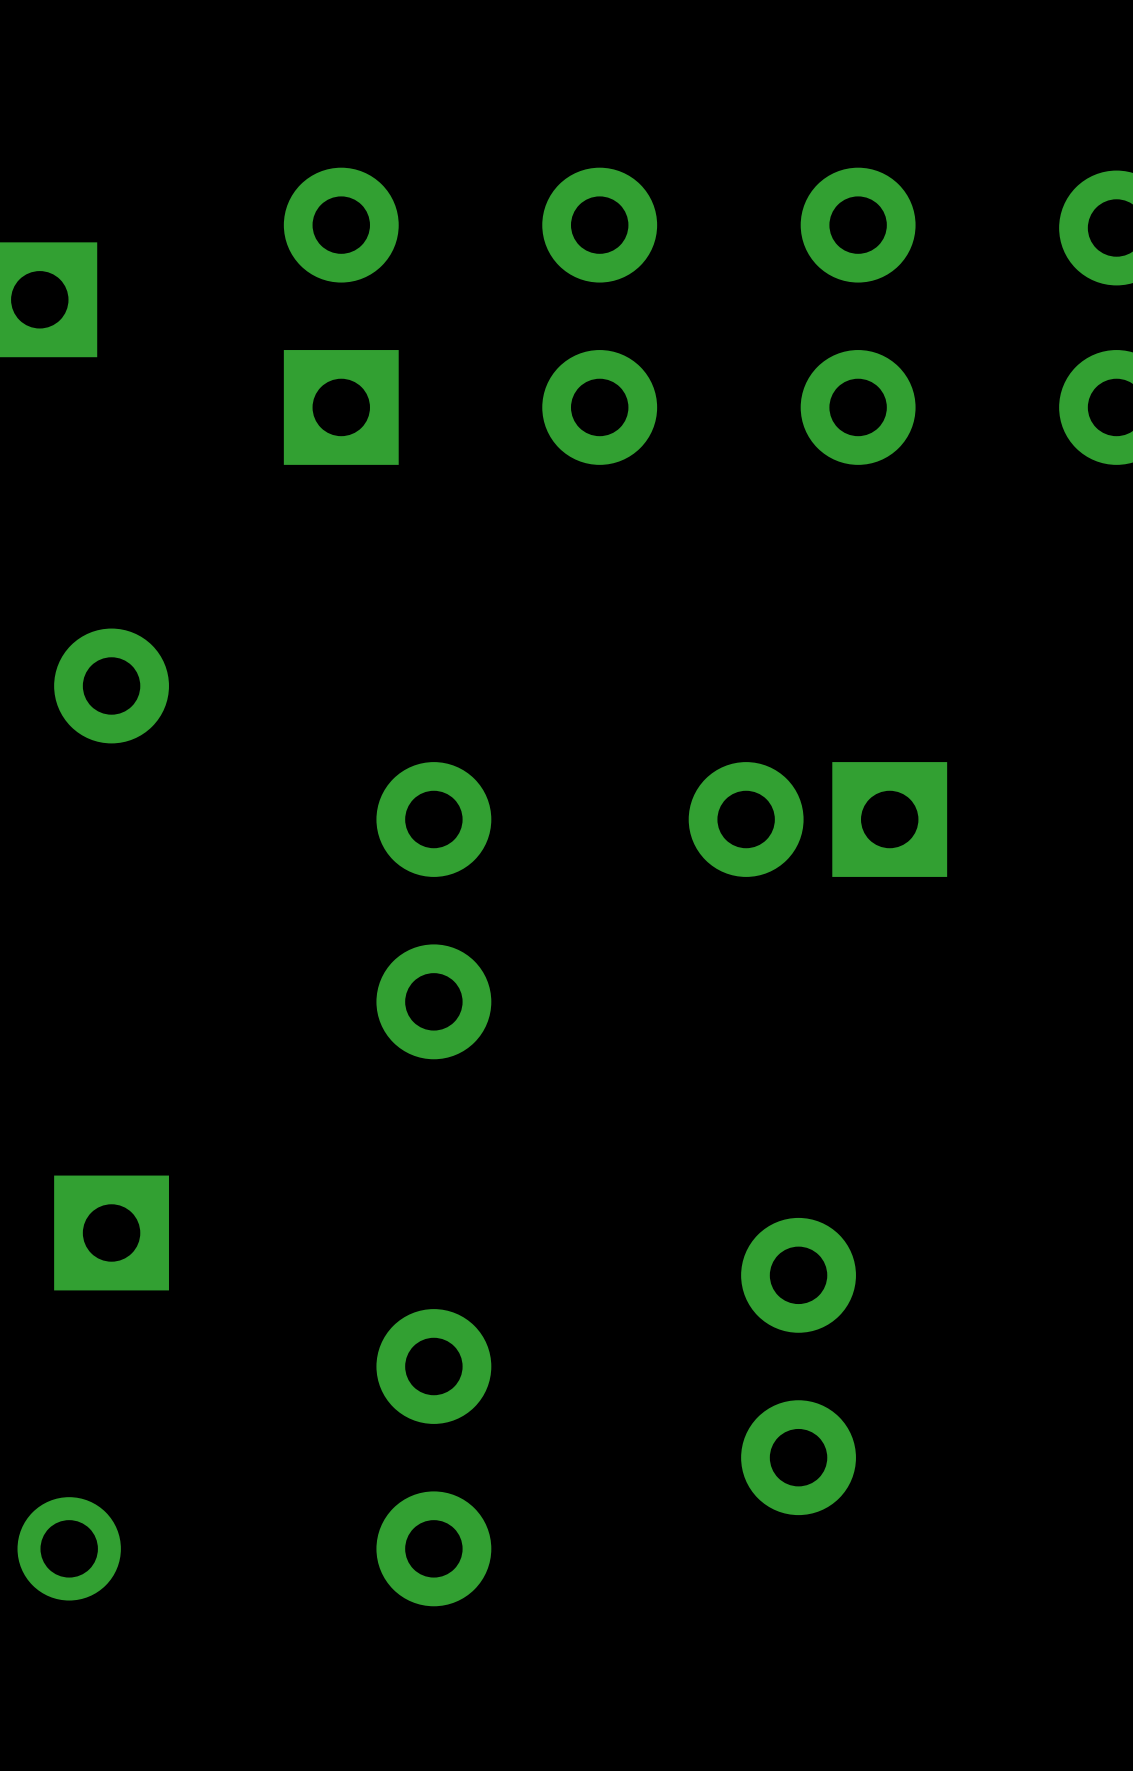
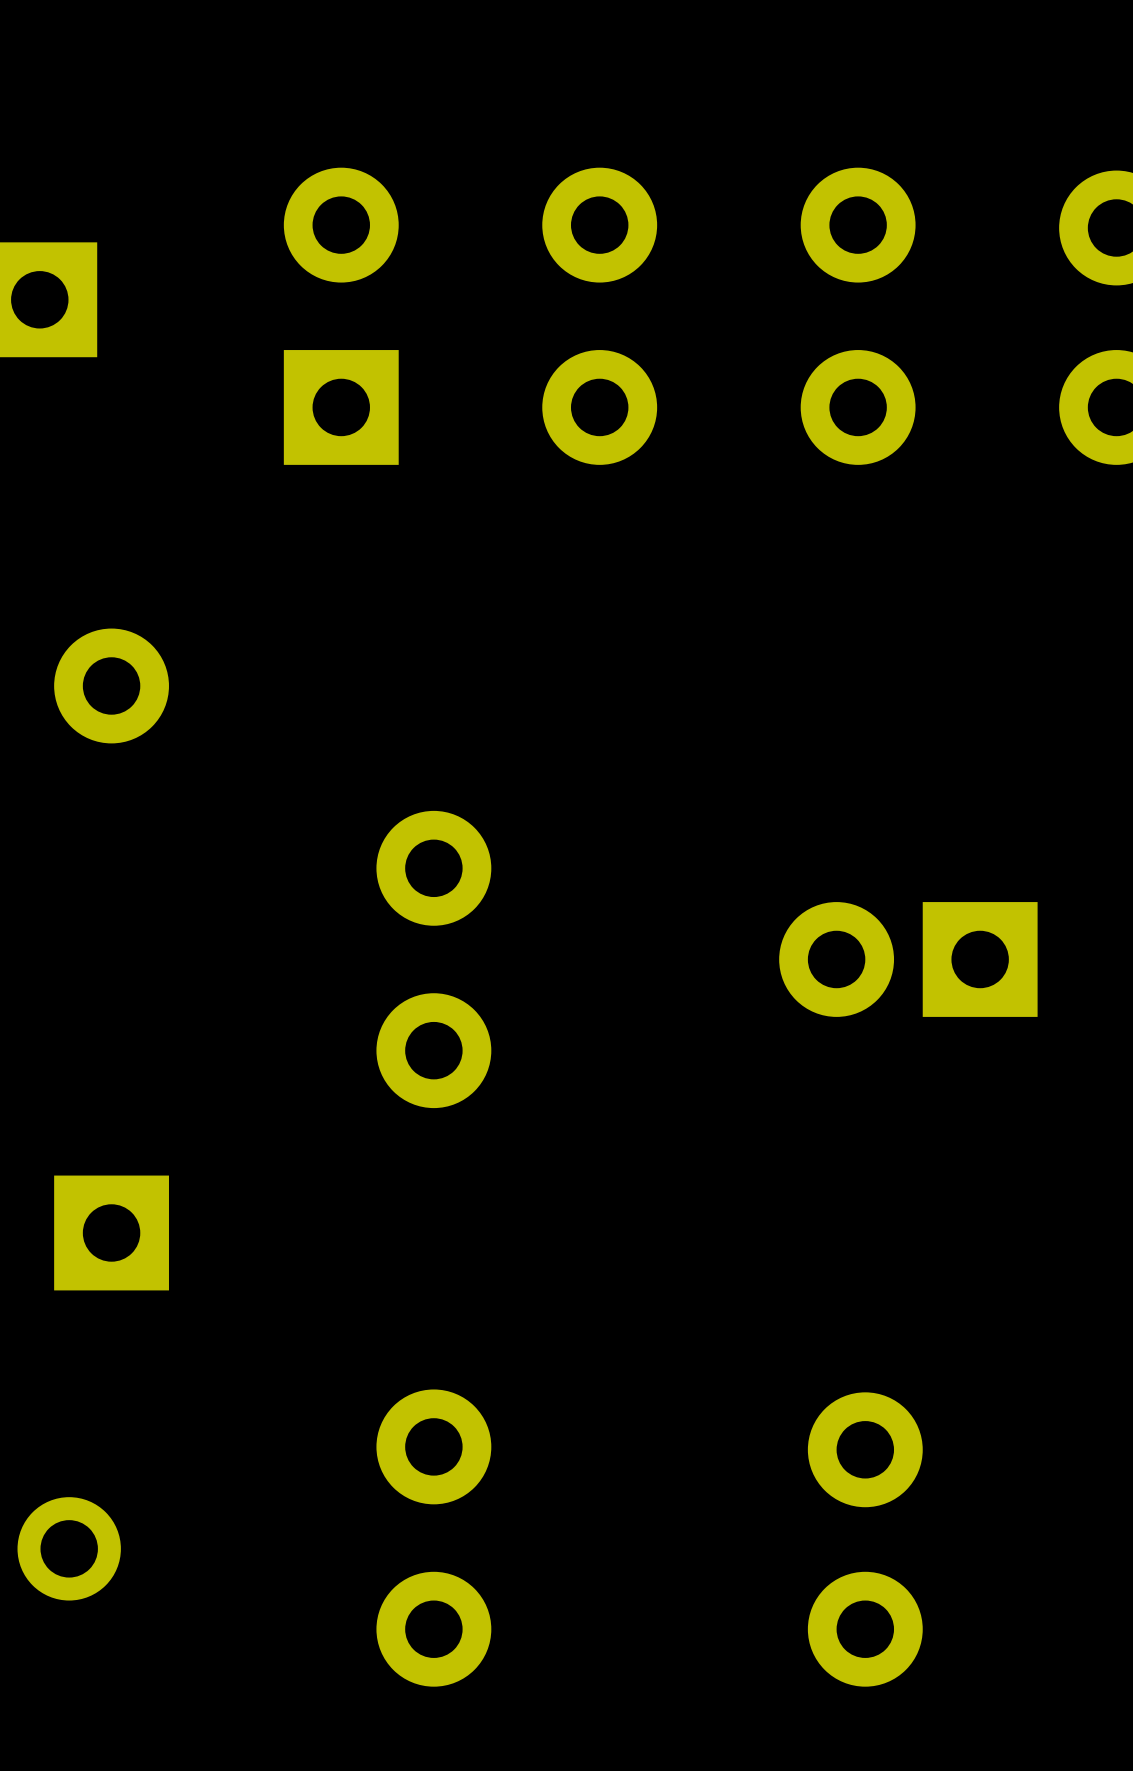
part position: (817, 819) -> (908, 959)
part position: (433, 910) -> (433, 959)
part position: (798, 1366) -> (865, 1539)
part position: (433, 1457) -> (433, 1538)

